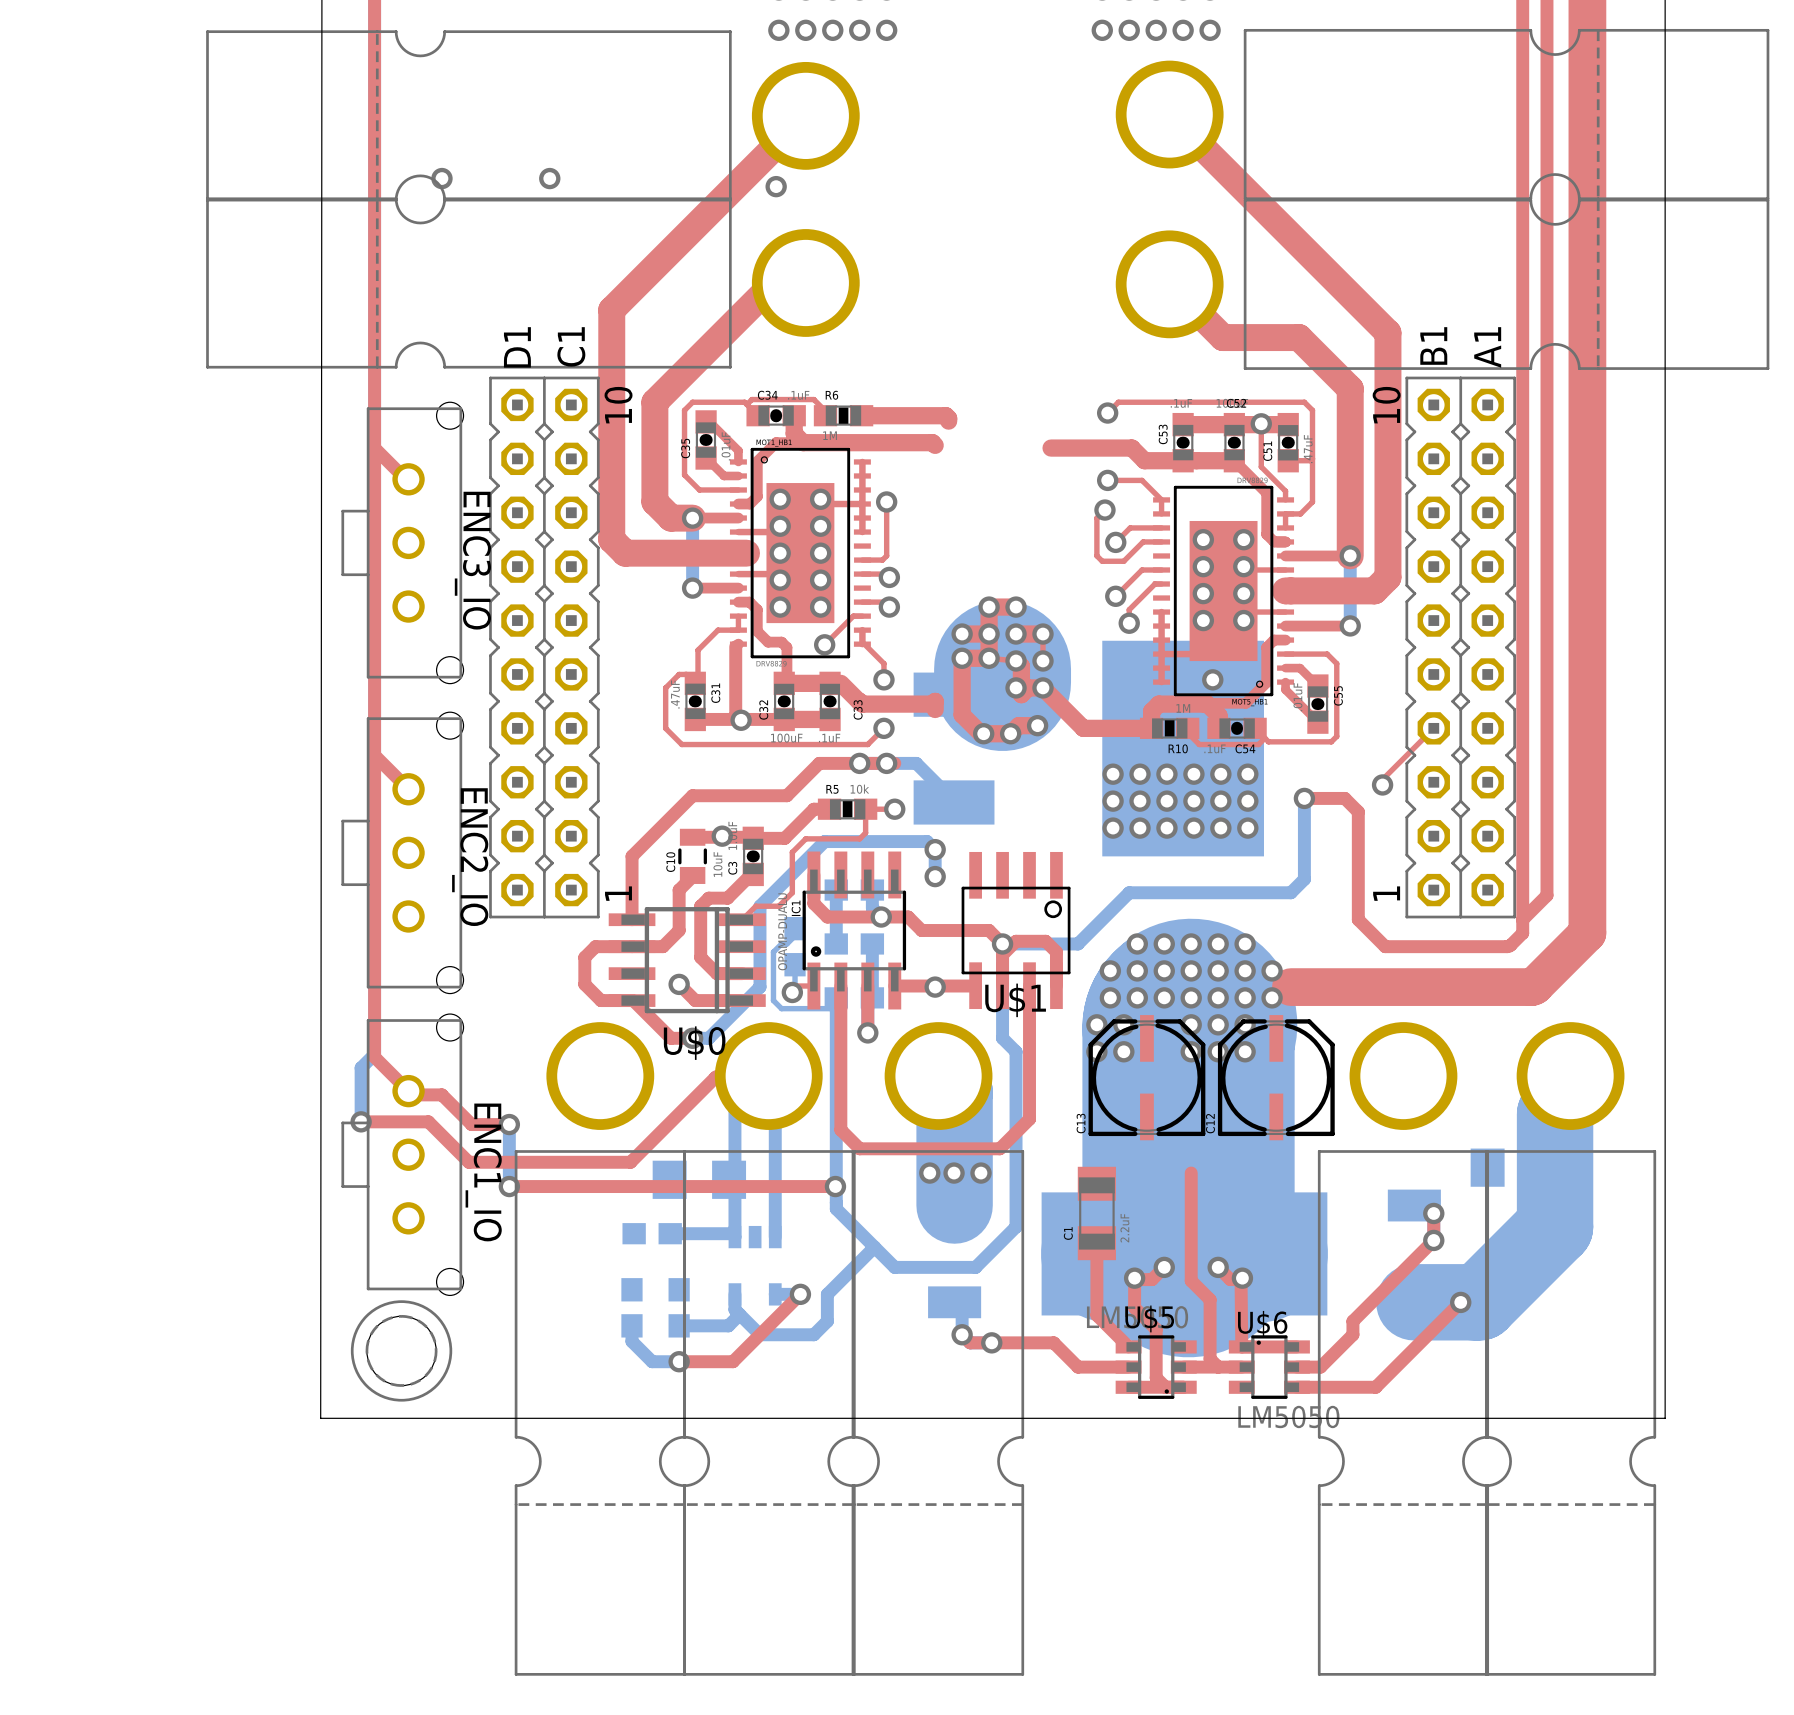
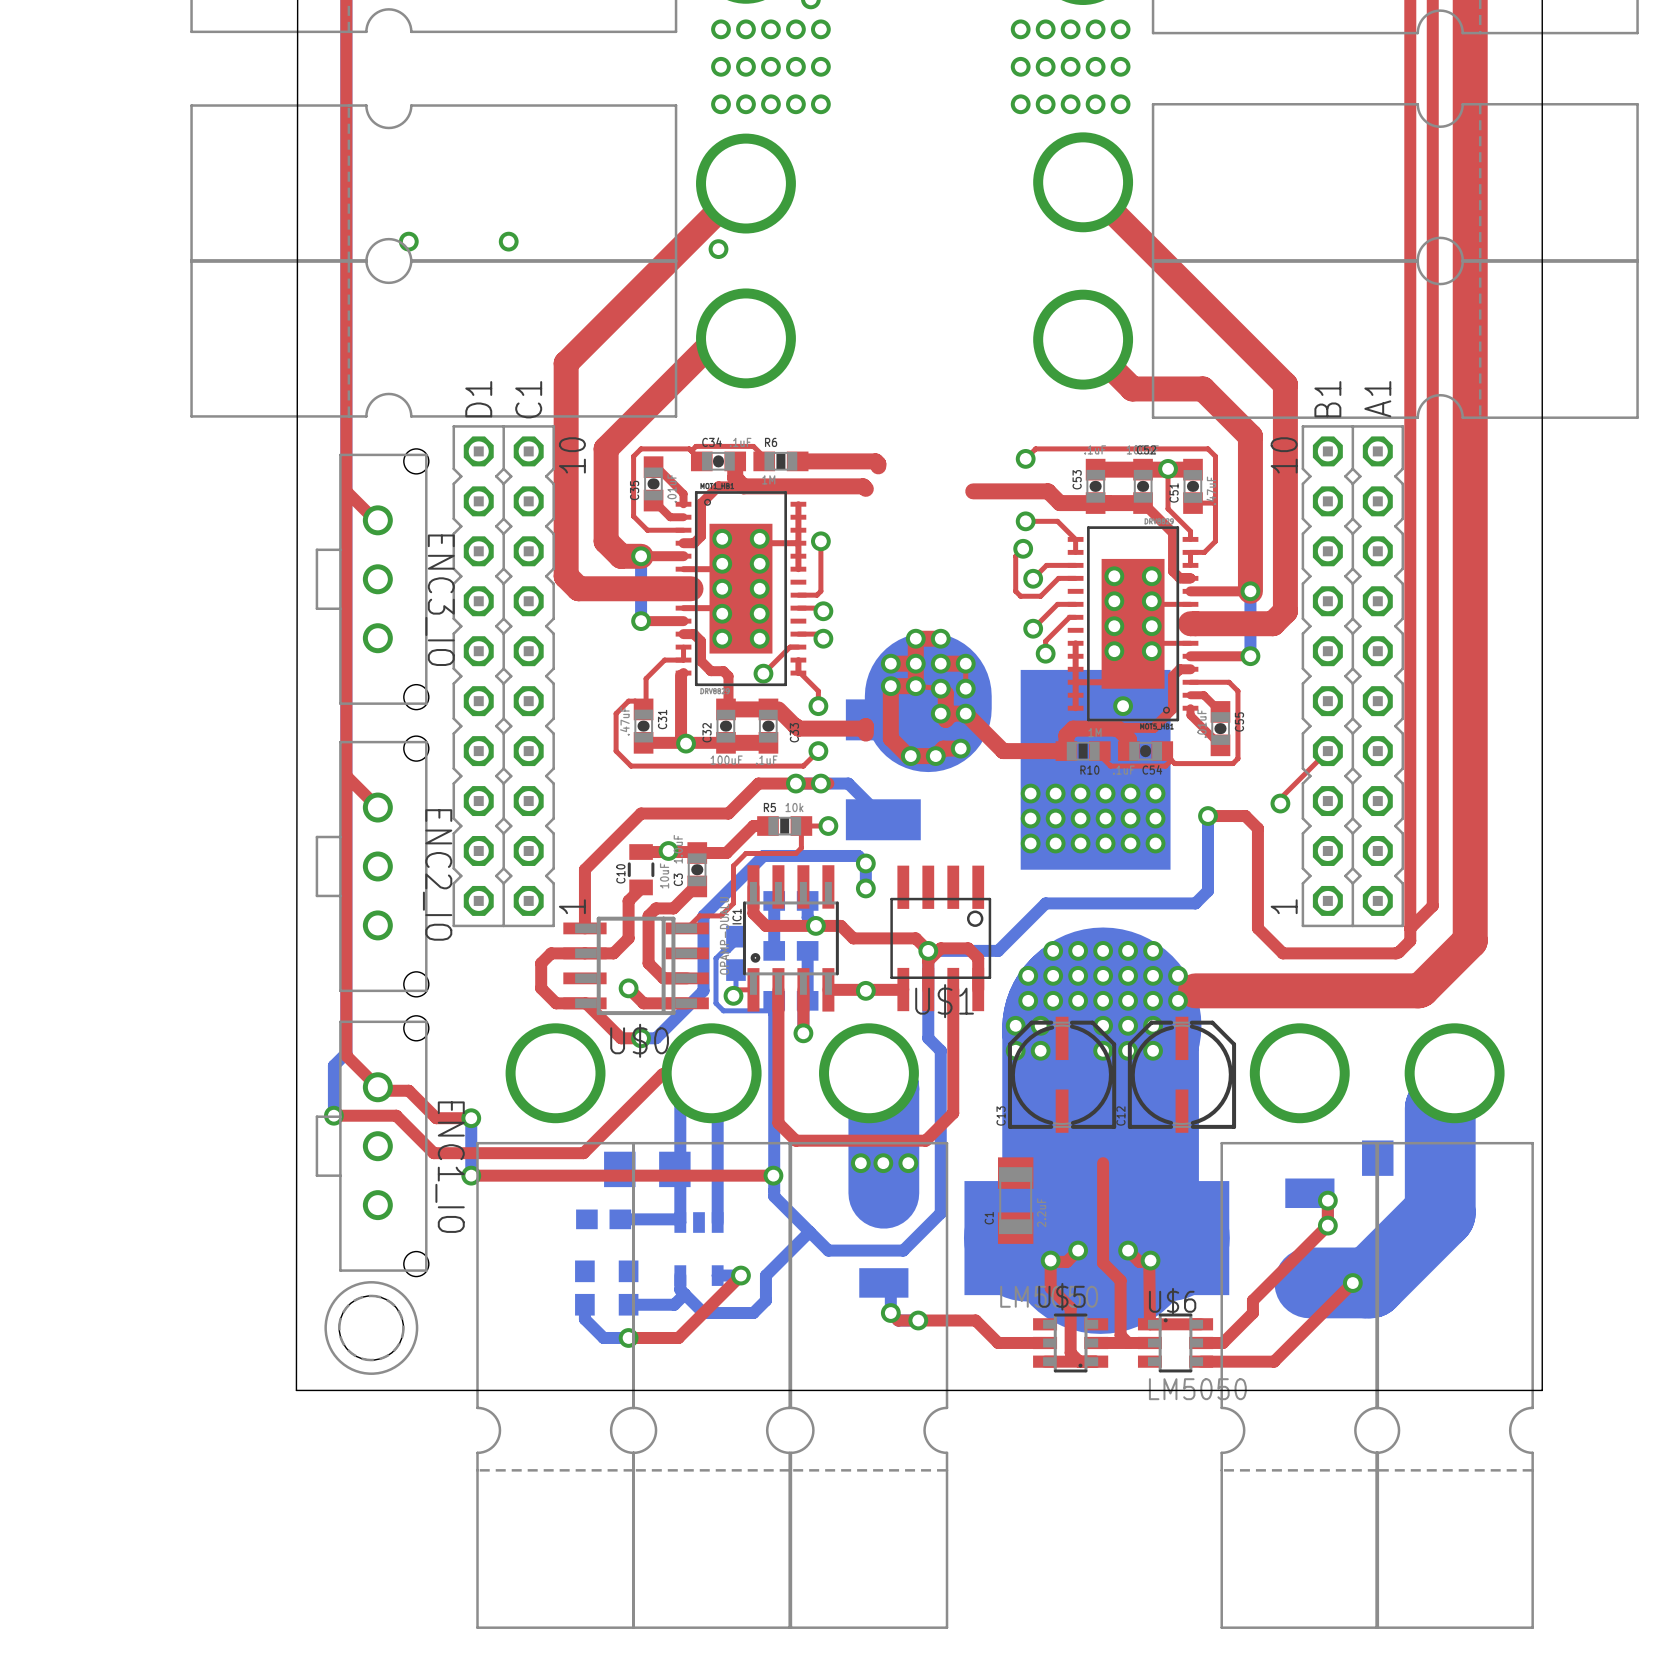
top track: (1096, 1243) (1096, 1315) (1128, 1346) -> none

